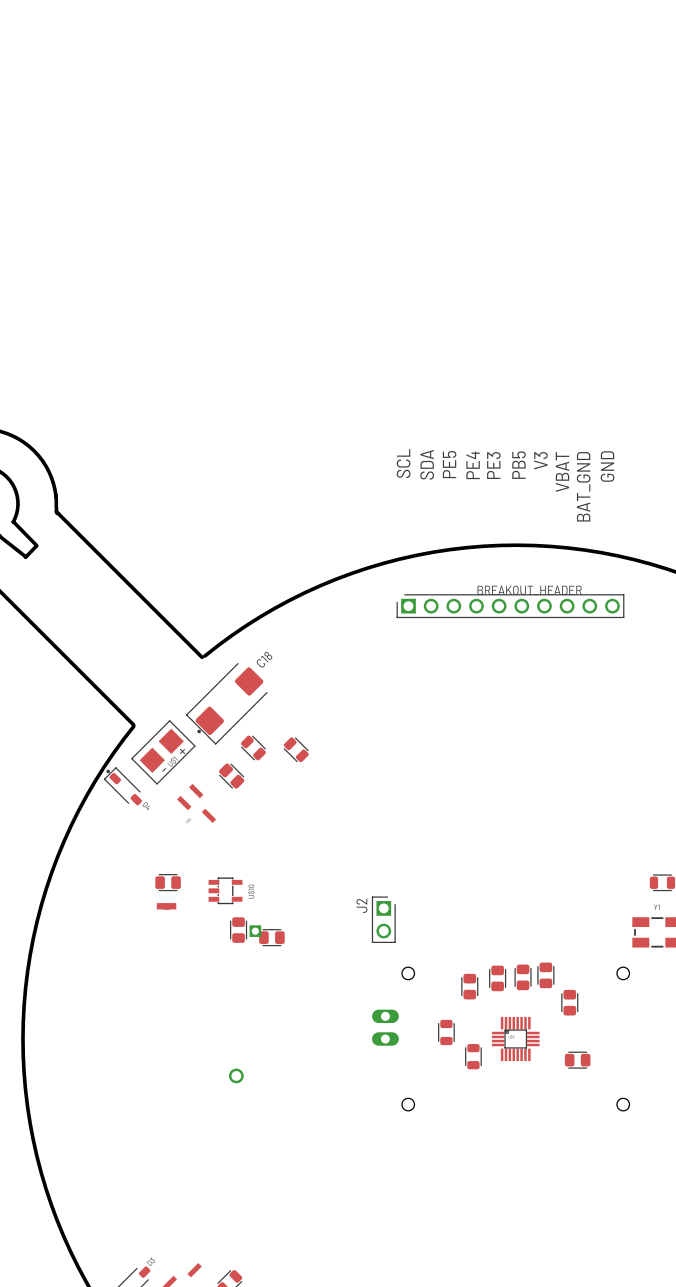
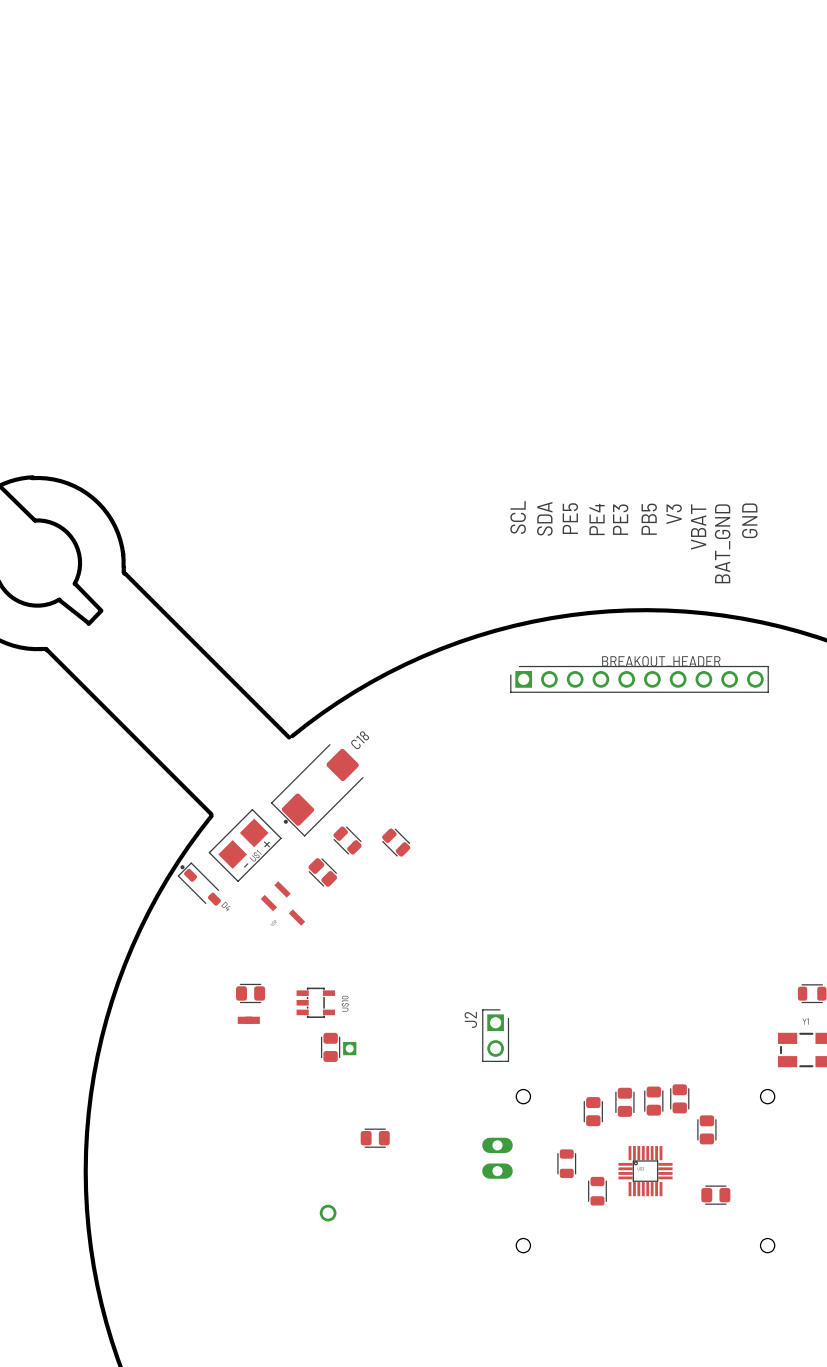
part position: (271, 937) -> (375, 1138)

